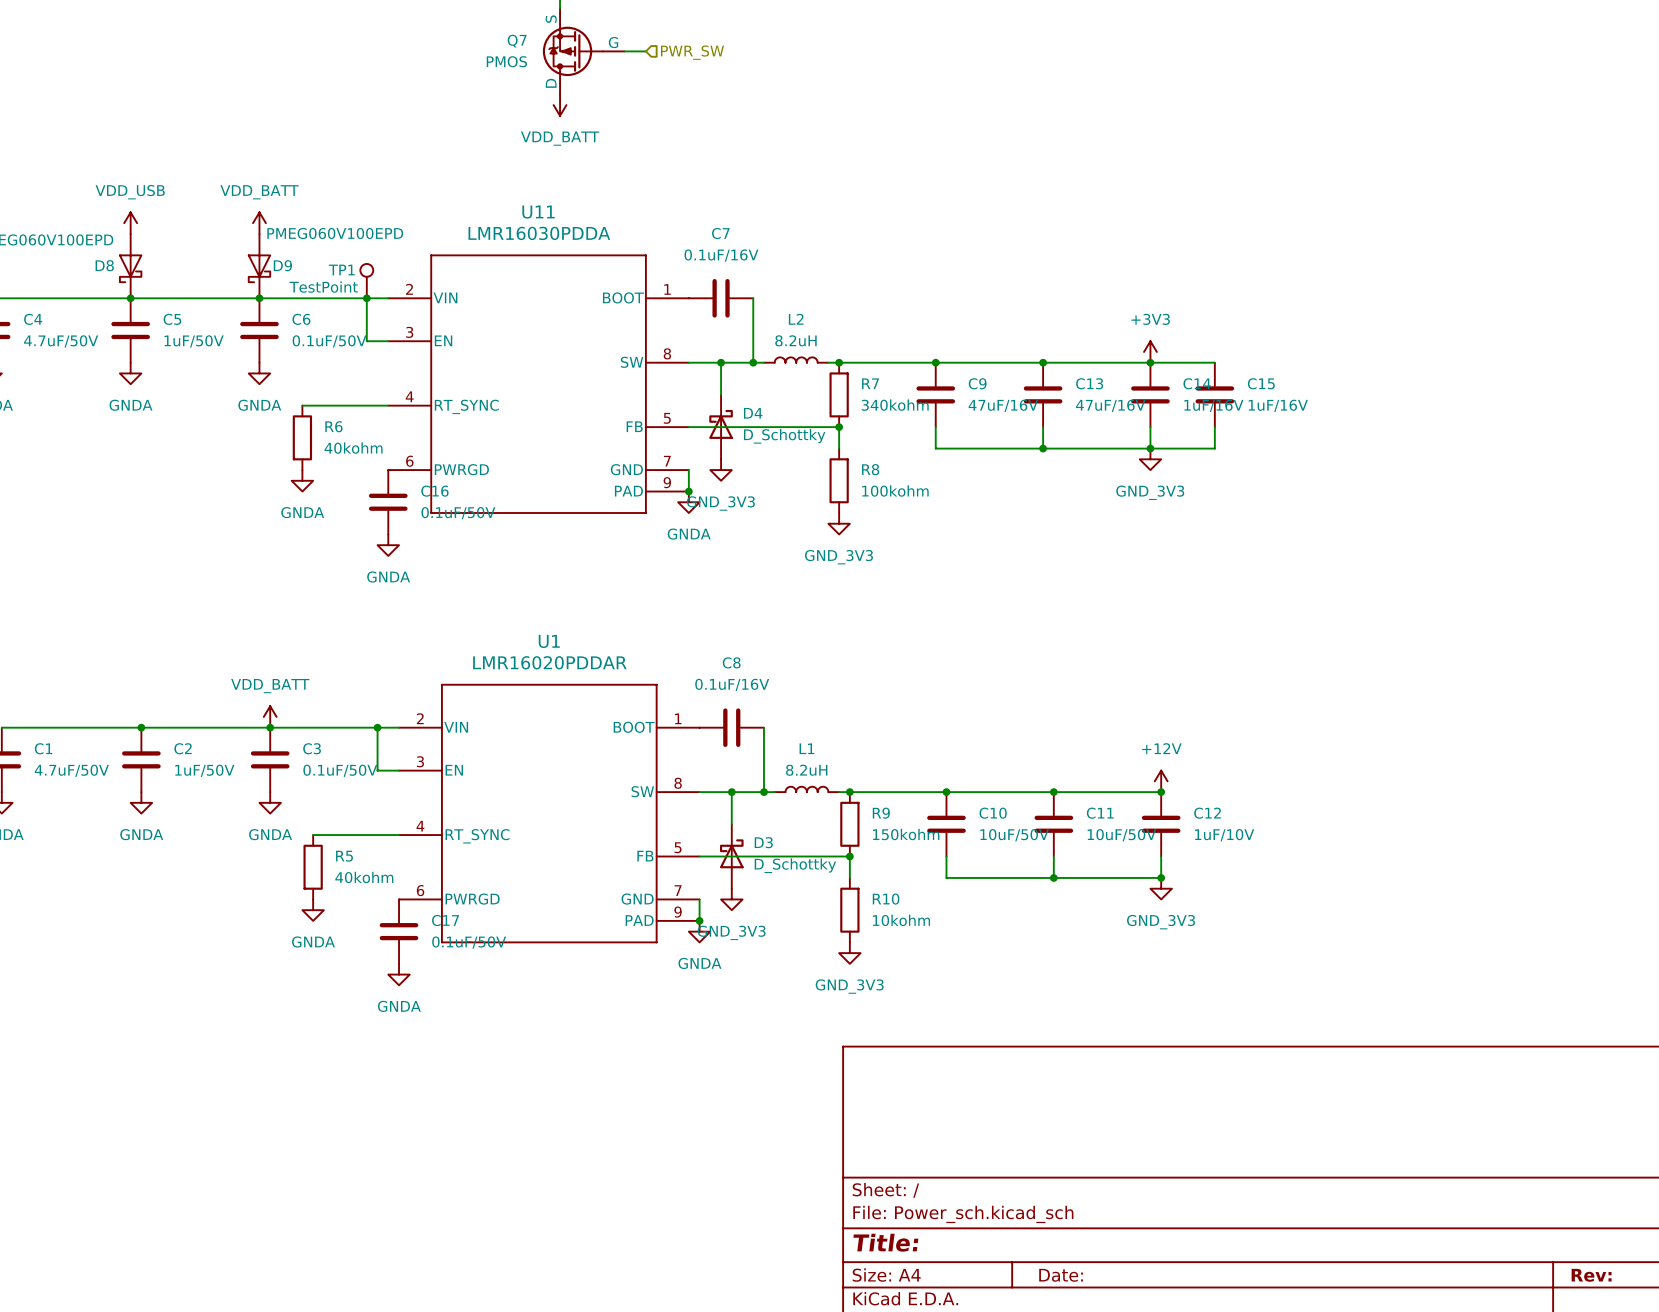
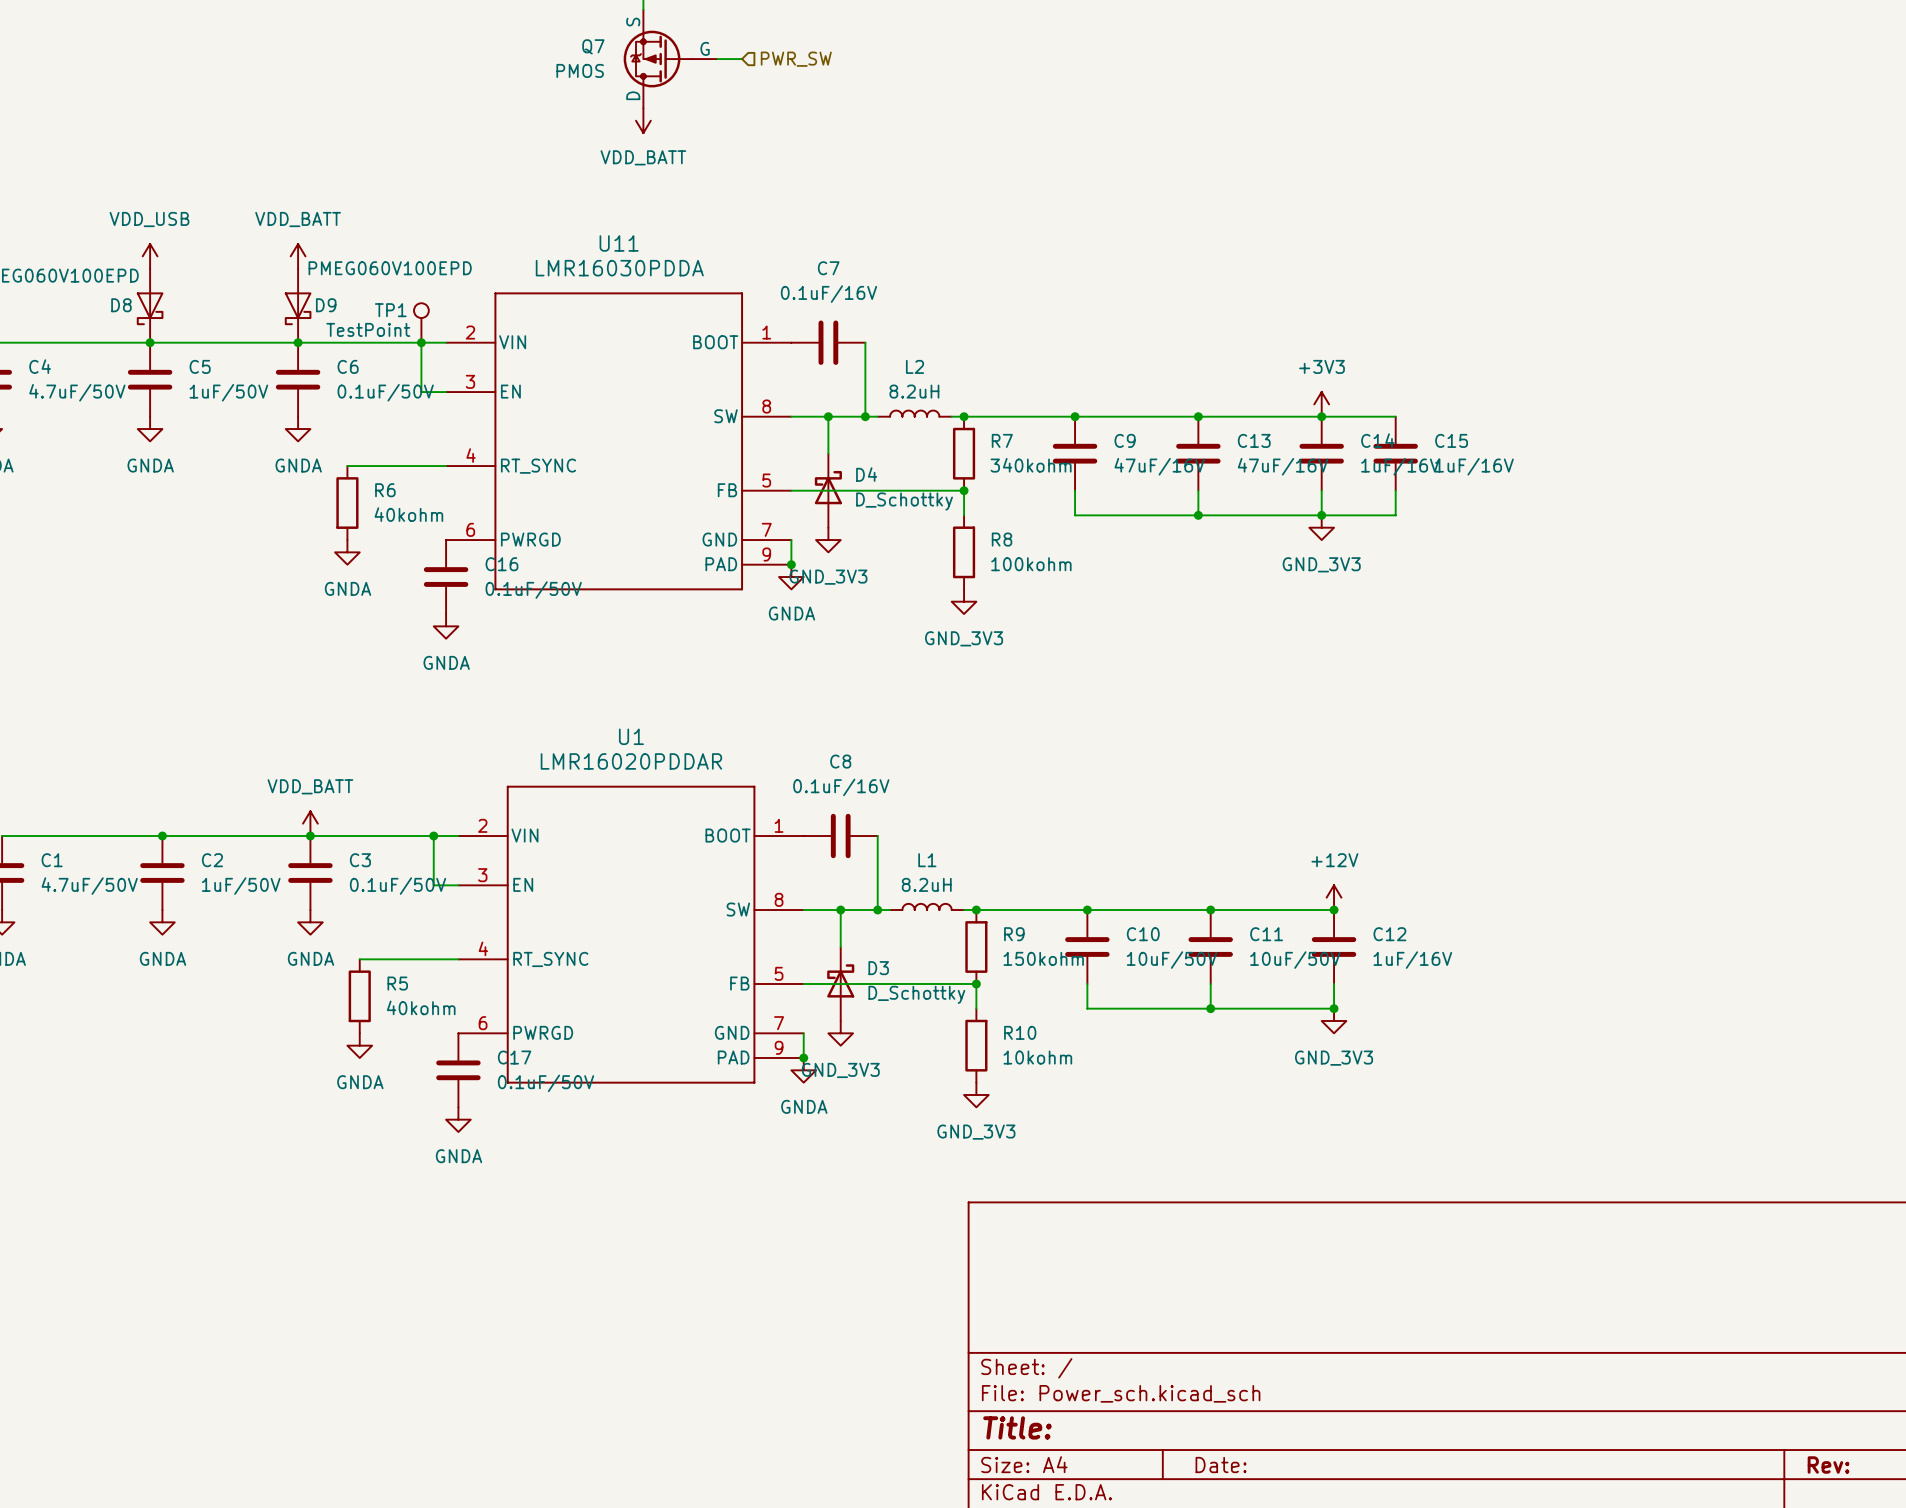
C12 value: 1uF/10V (1224, 835) -> 1uF/16V (1412, 960)

